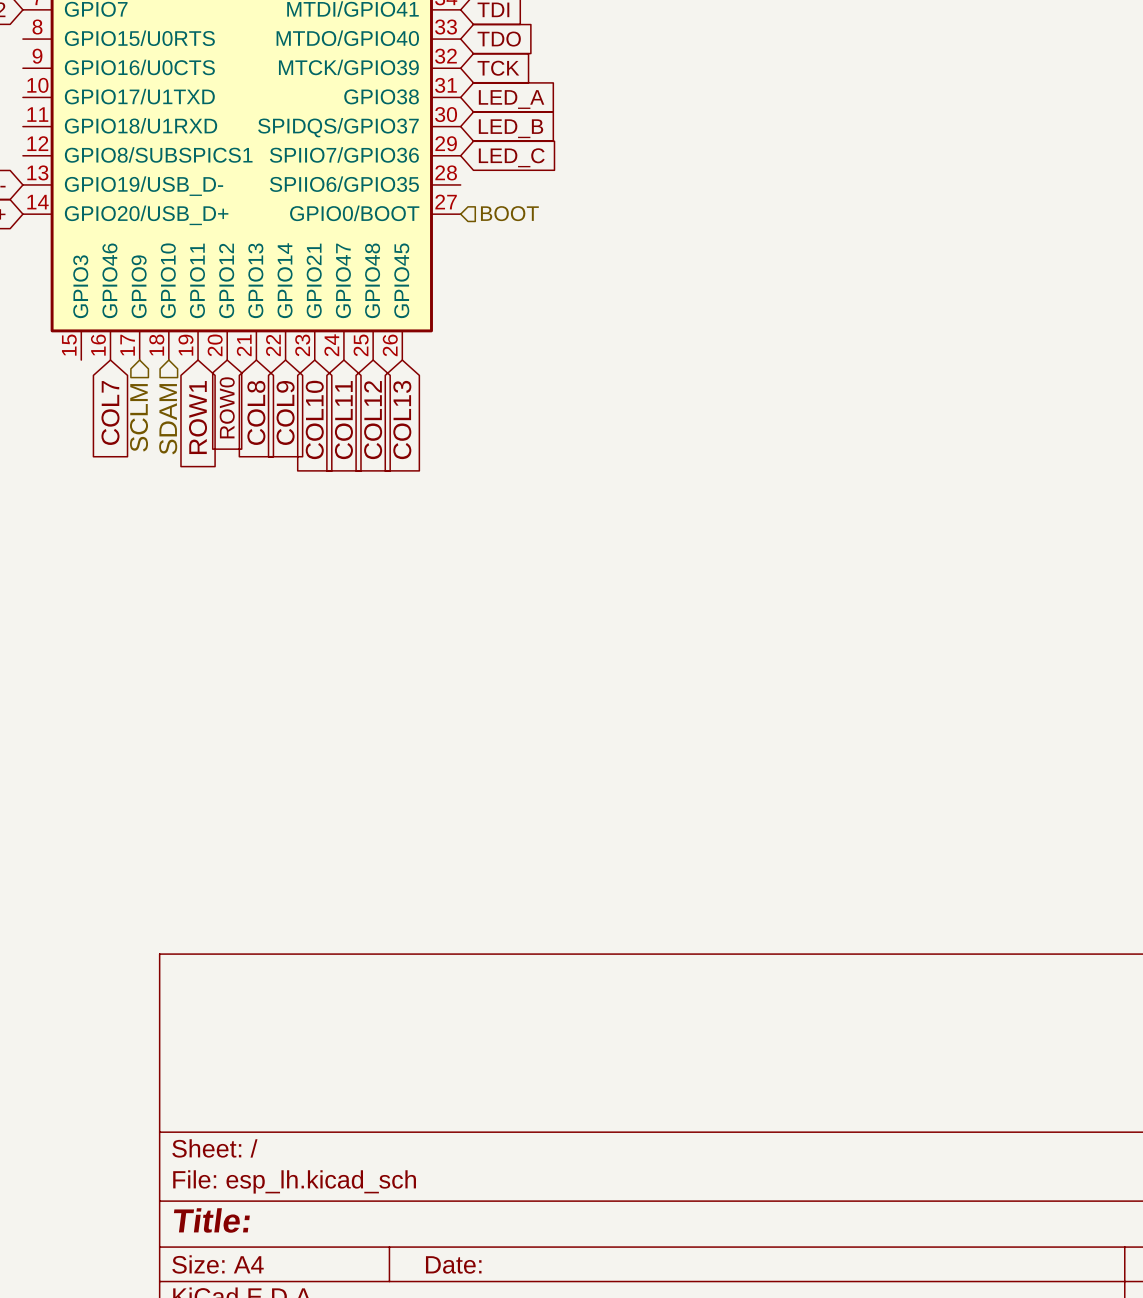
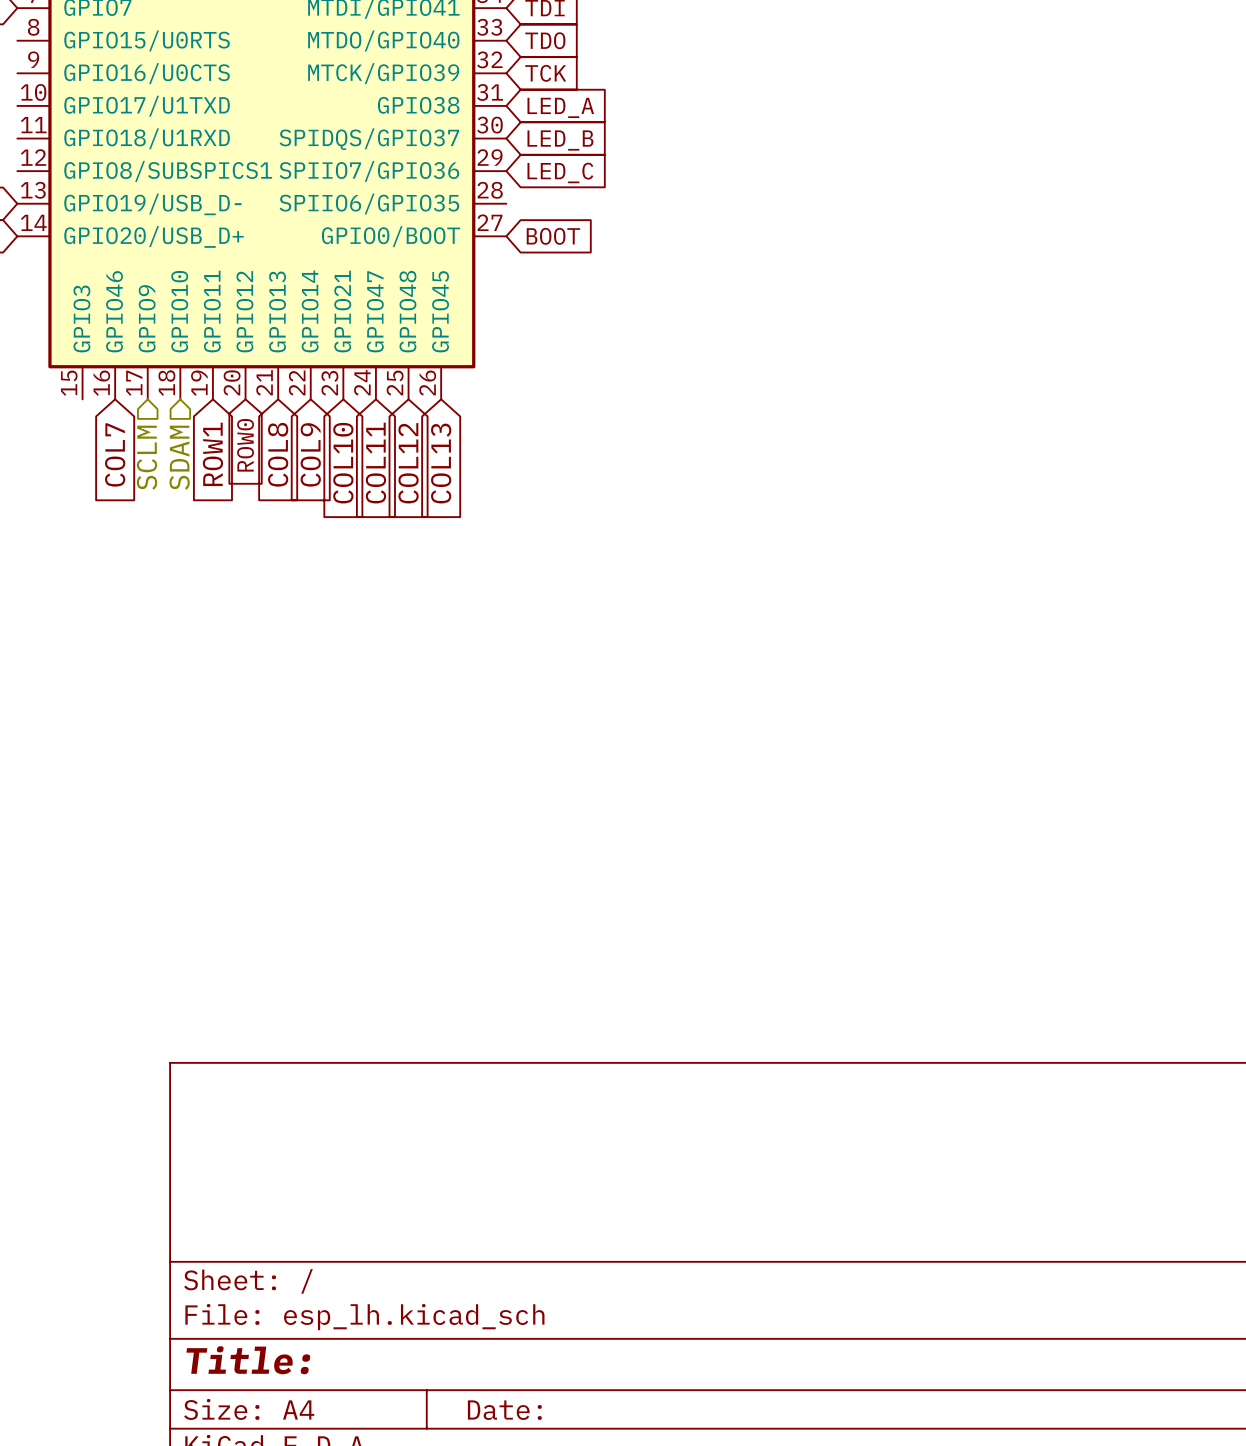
hierarchical label: BOOT (509, 213) -> none
global label: none -> BOOT (553, 236)

